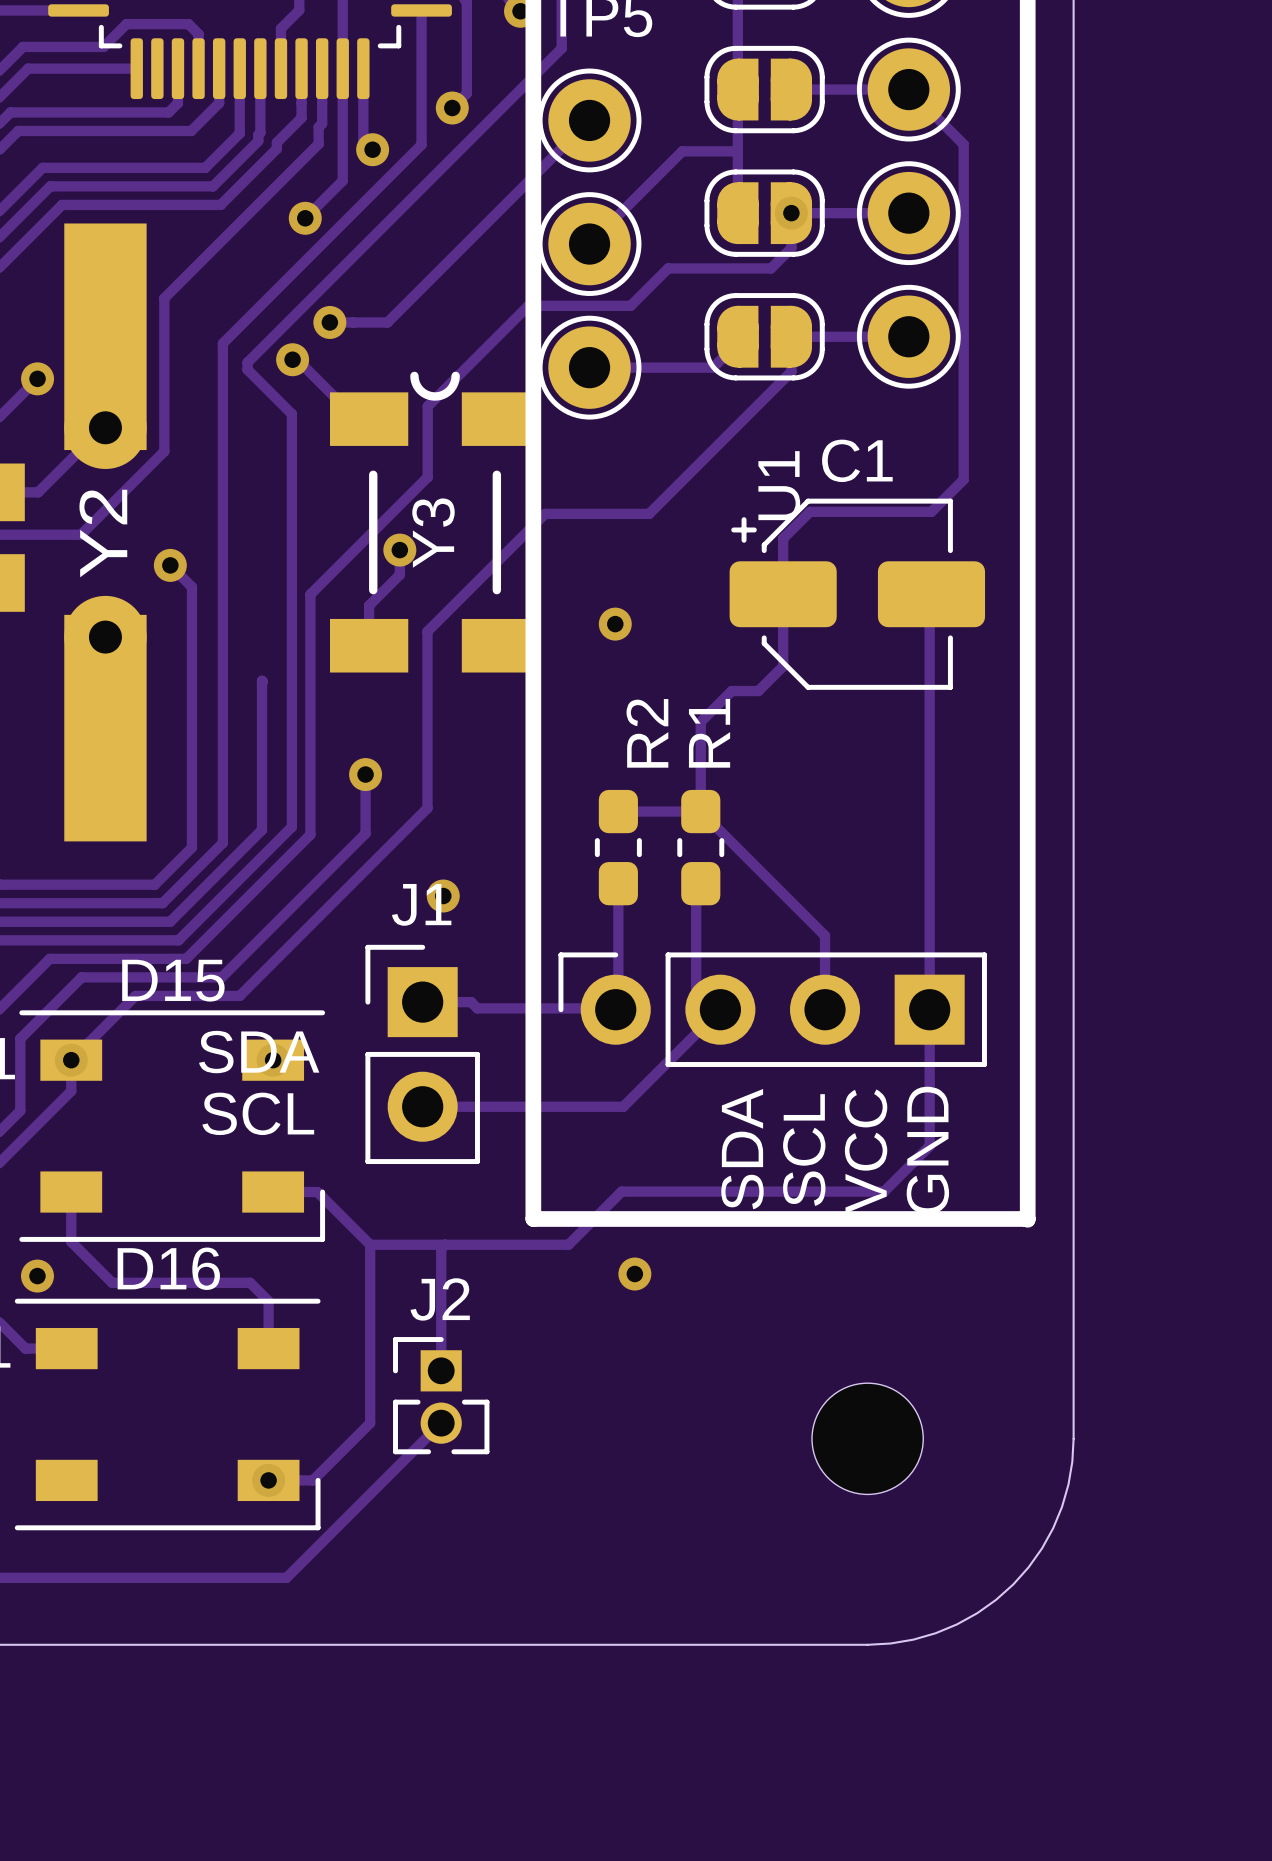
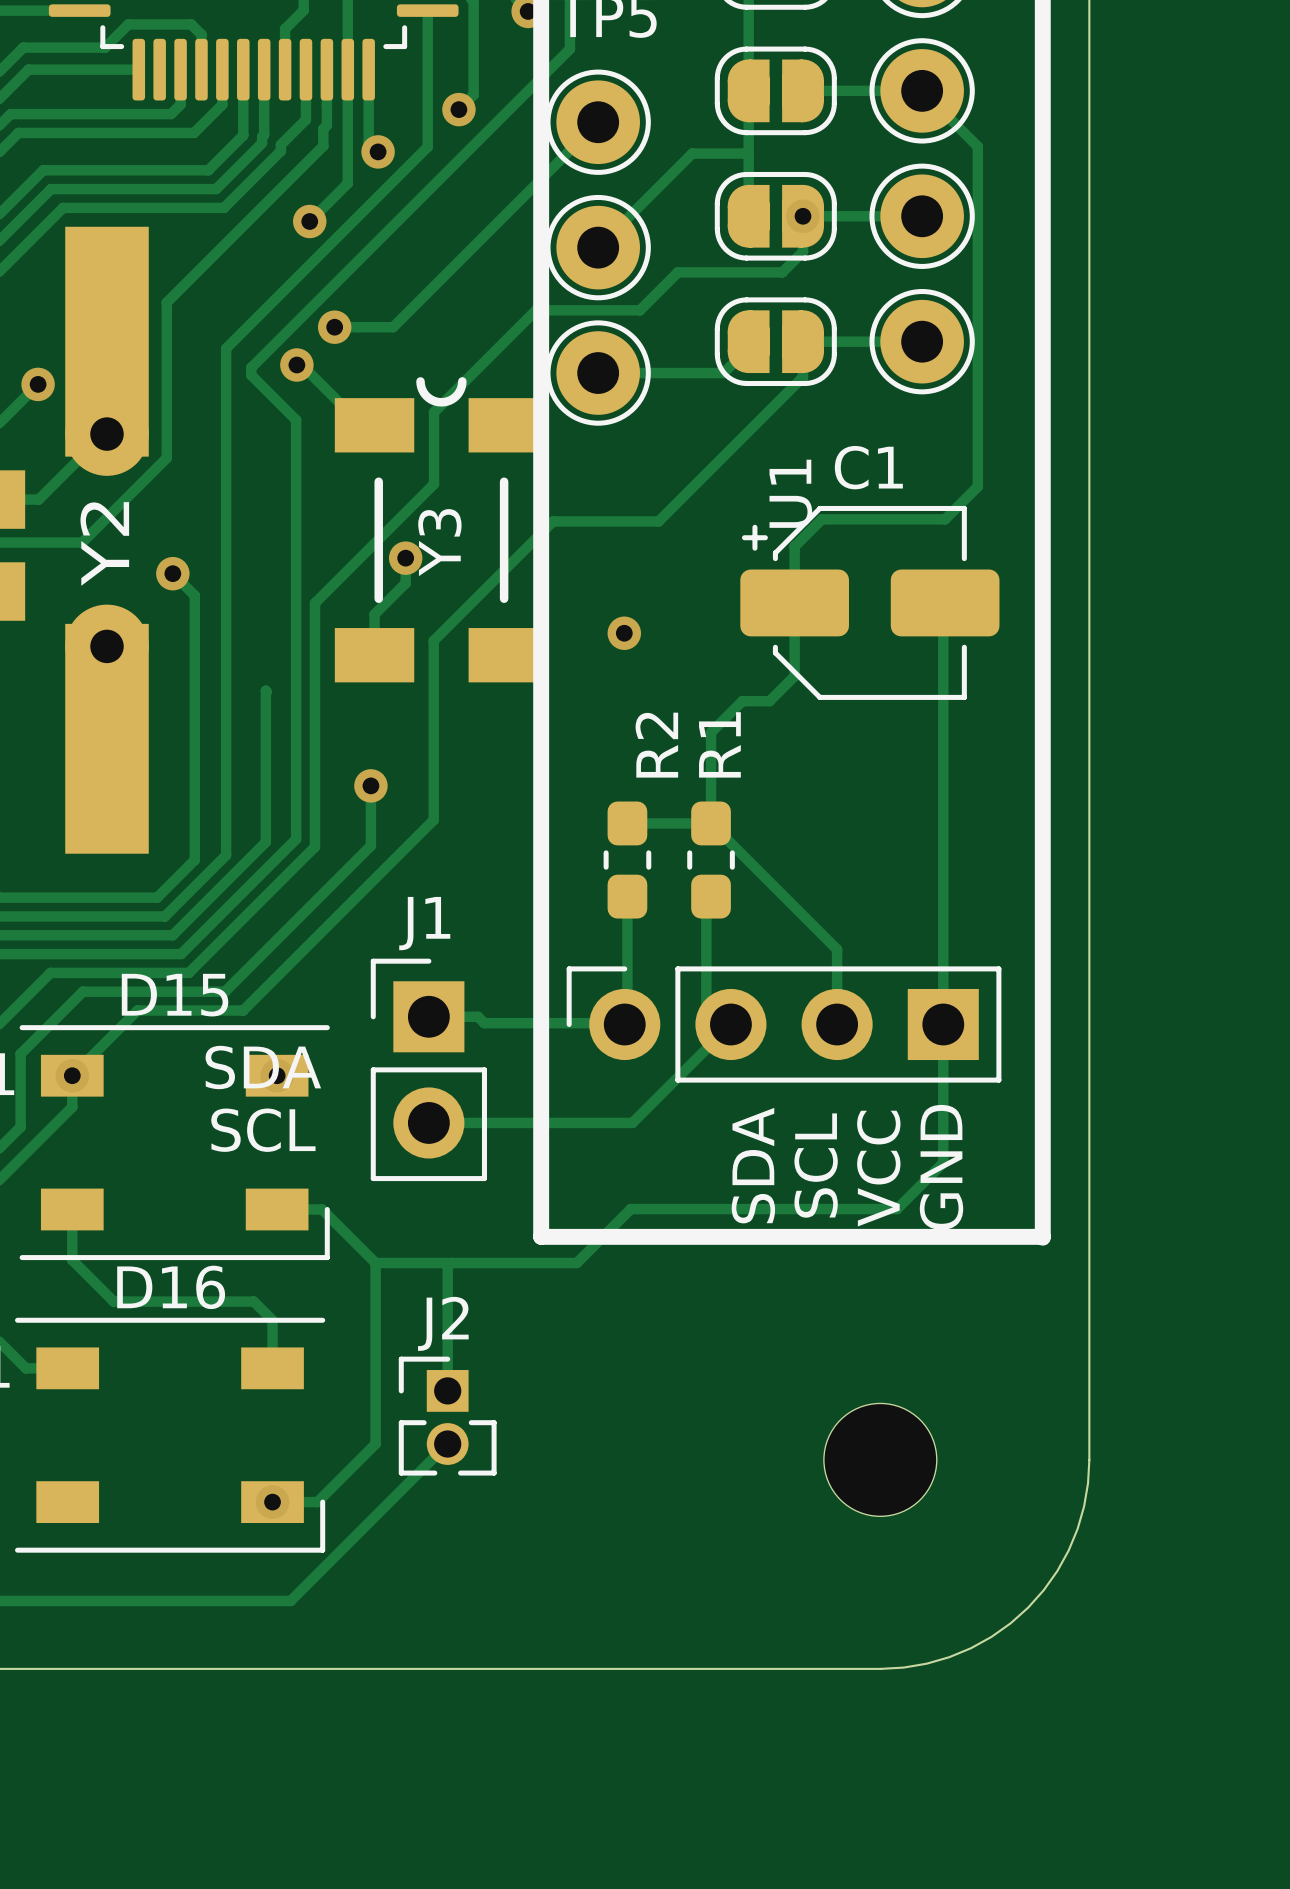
via: (443, 896) -> none
via: (634, 1274) -> none
via: (37, 1276) -> none

